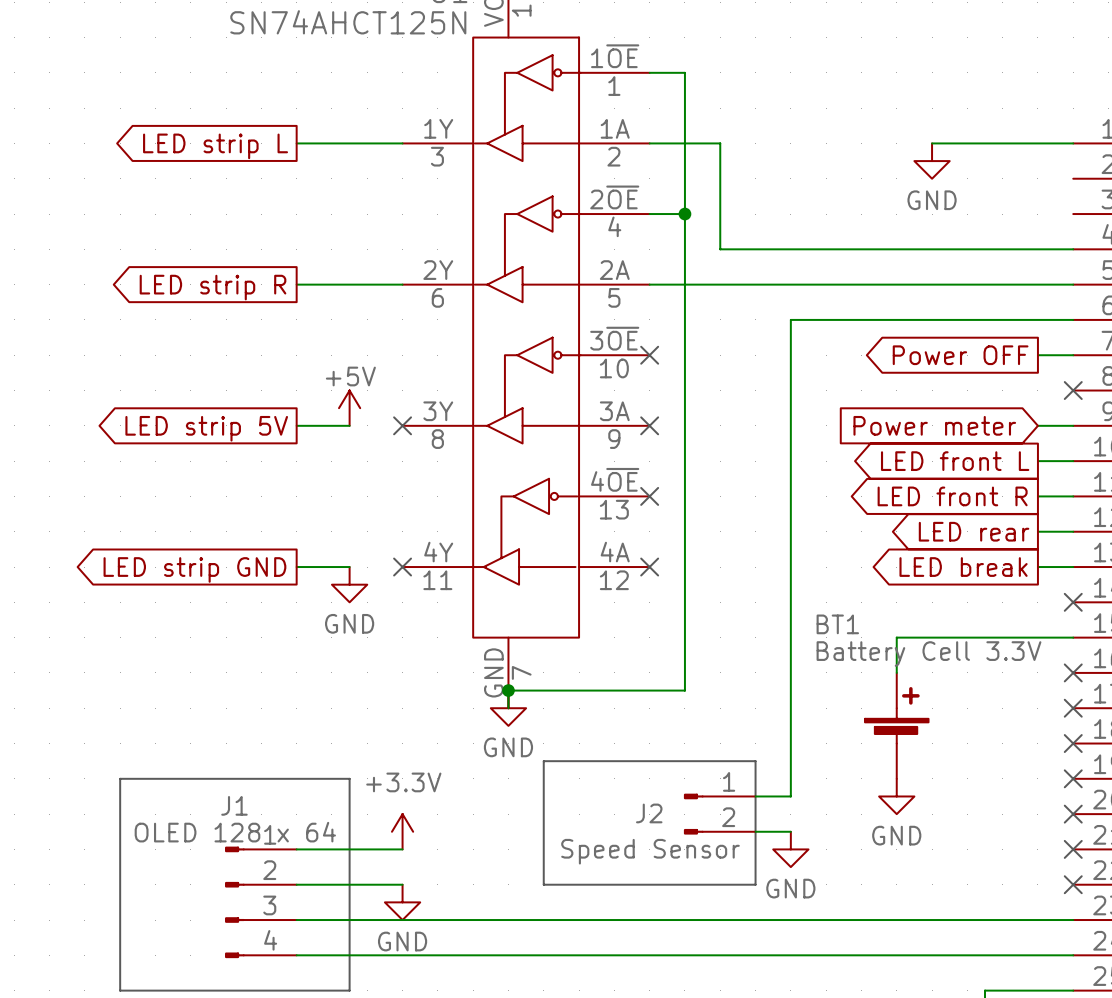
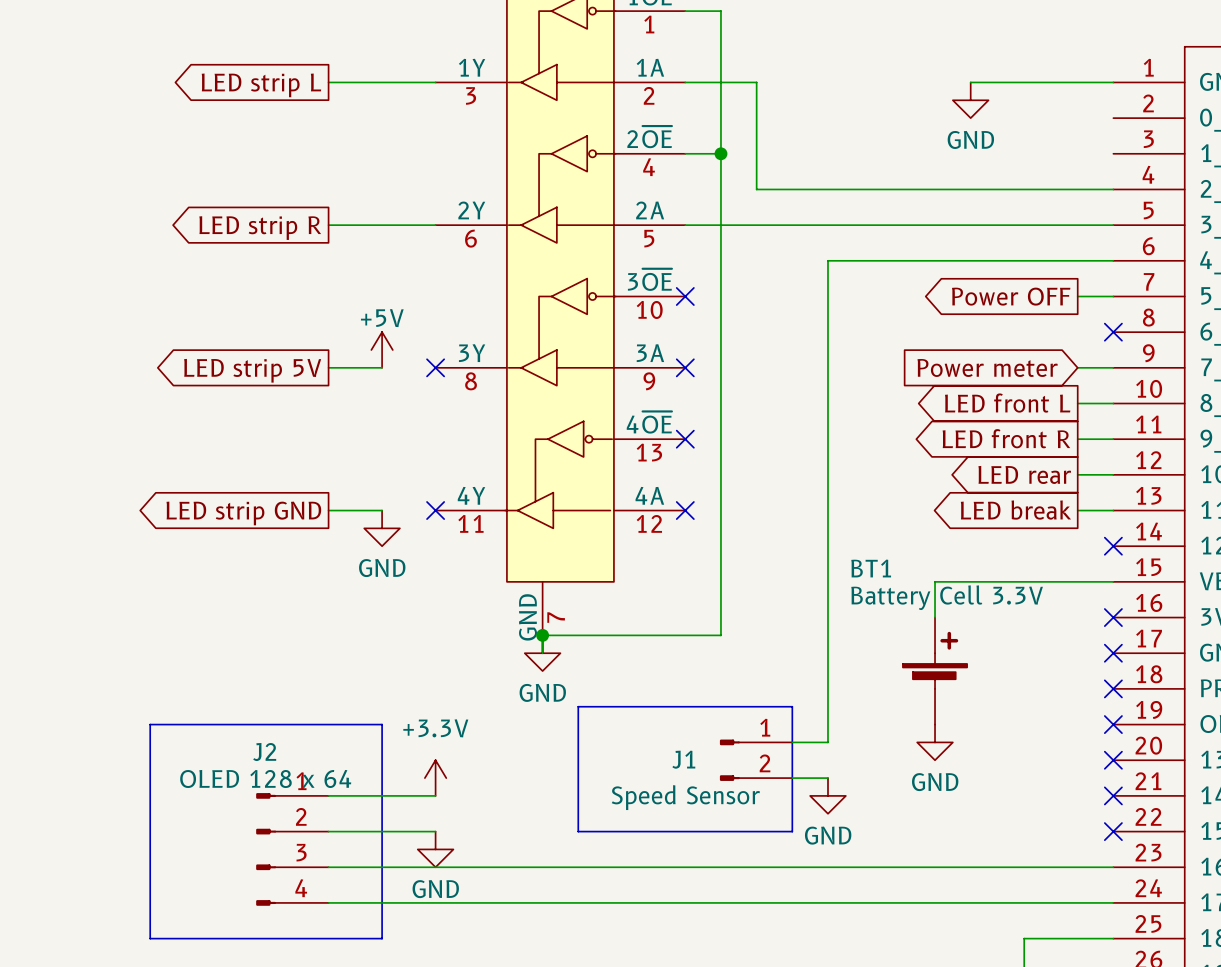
J1 name: J1 (234, 805) -> J2 (264, 752)
J2 name: J2 (649, 813) -> J1 (683, 759)

